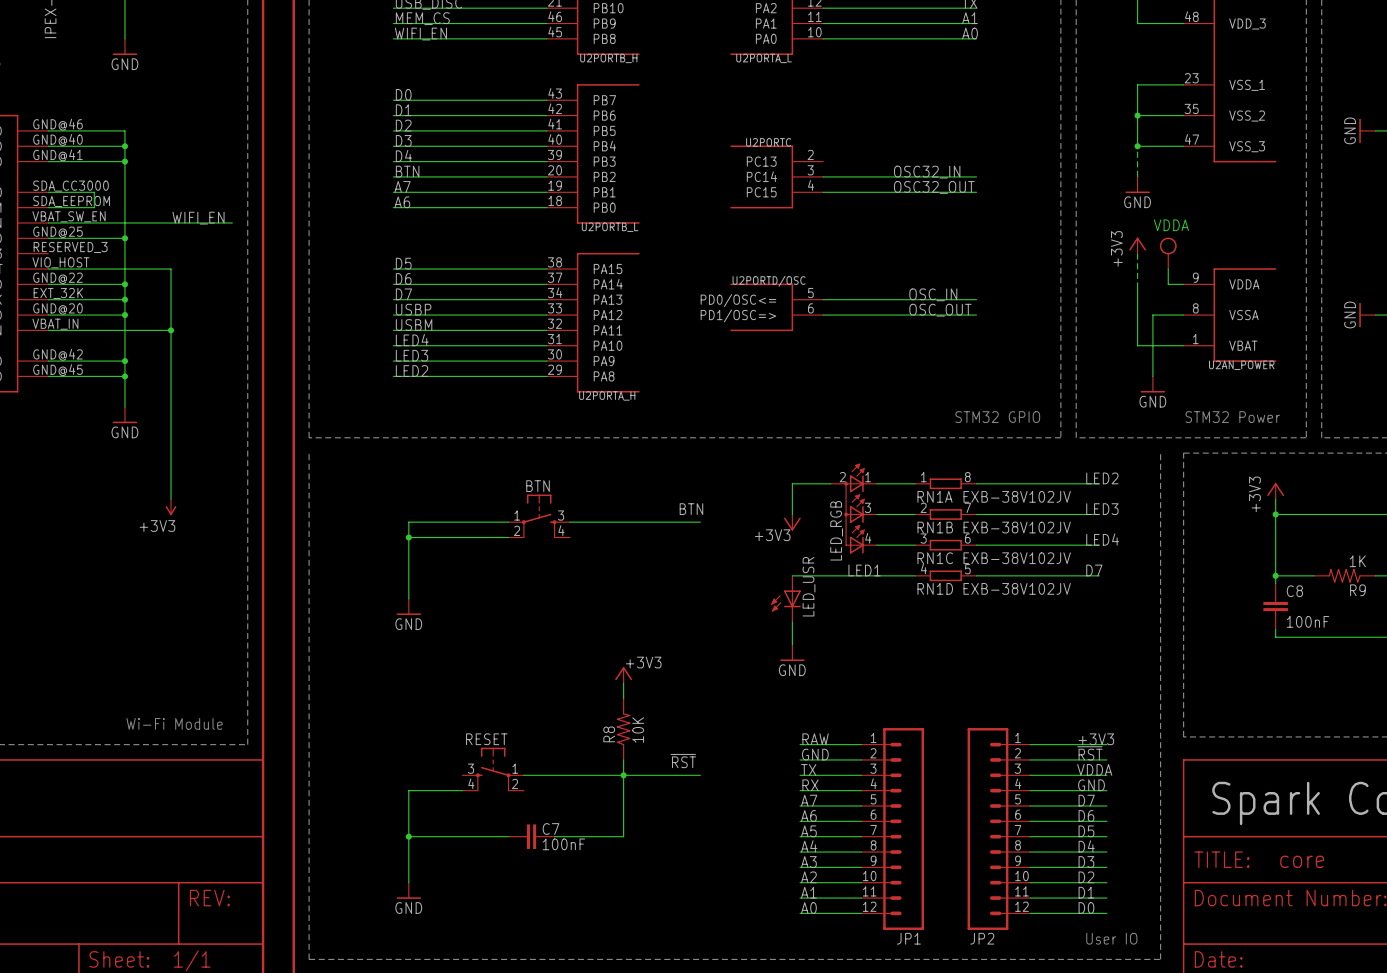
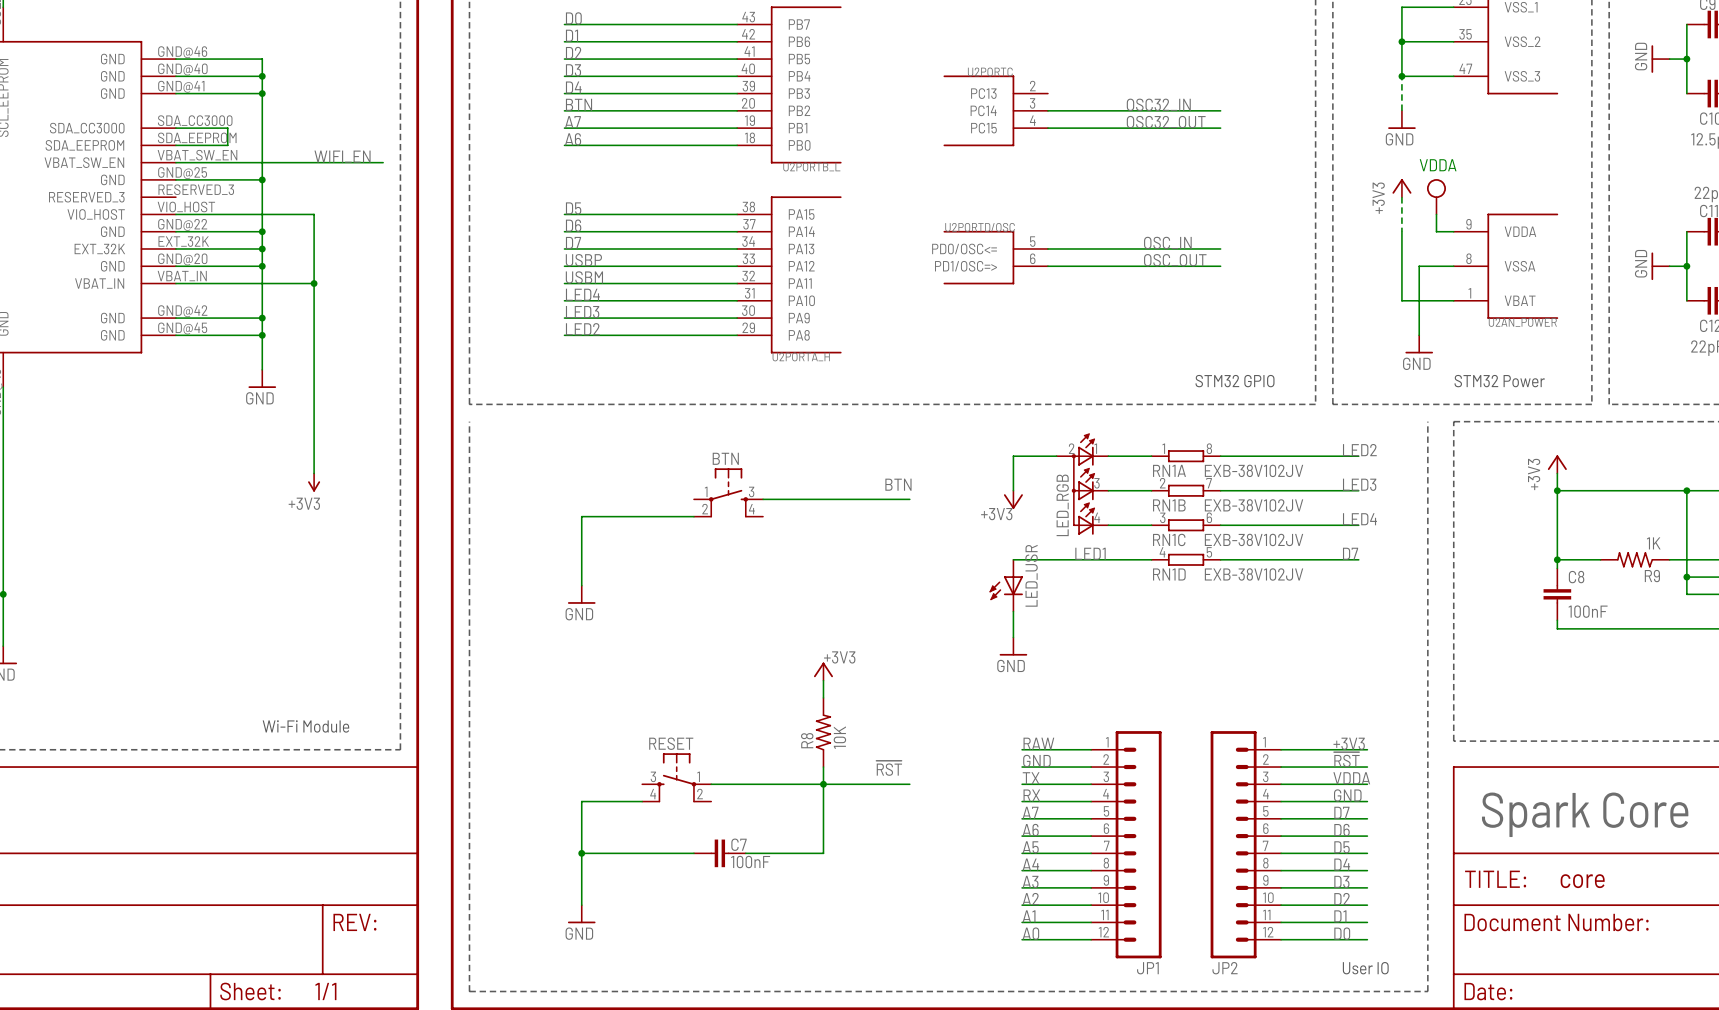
wire: (508, 522) (408, 522) (408, 537) -> none
junction: (408, 537) -> none

